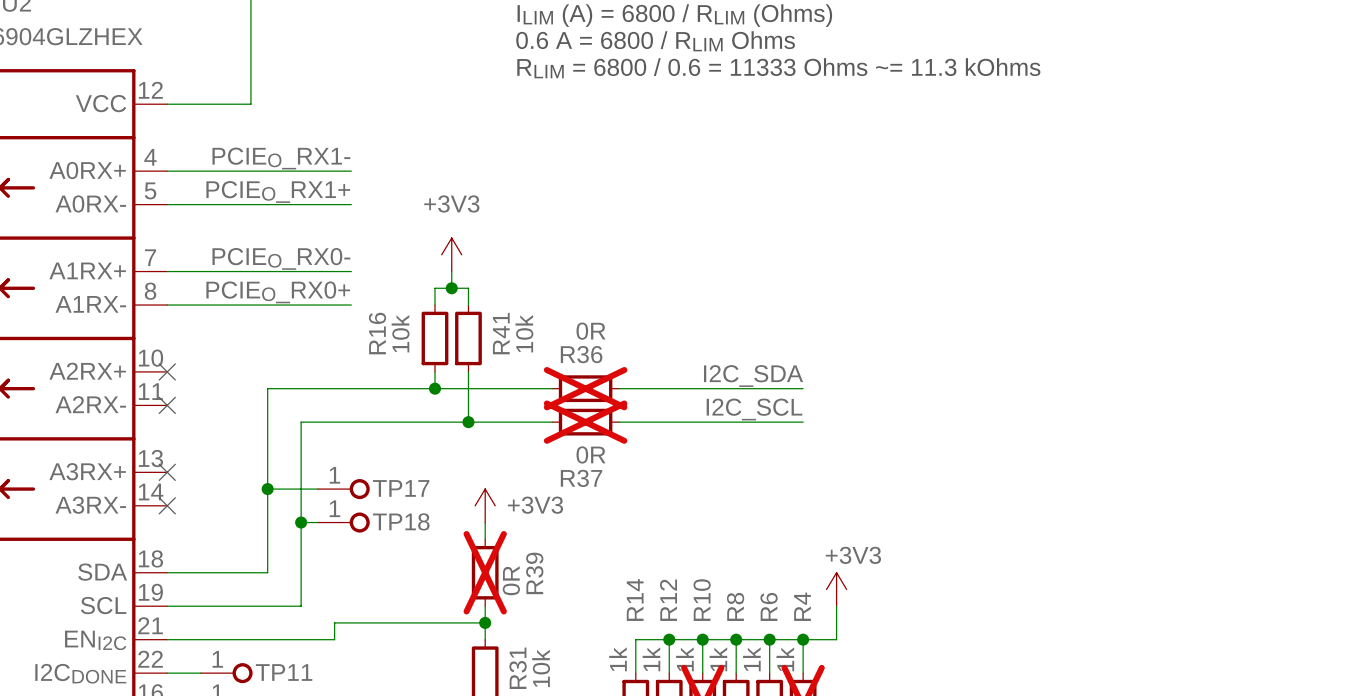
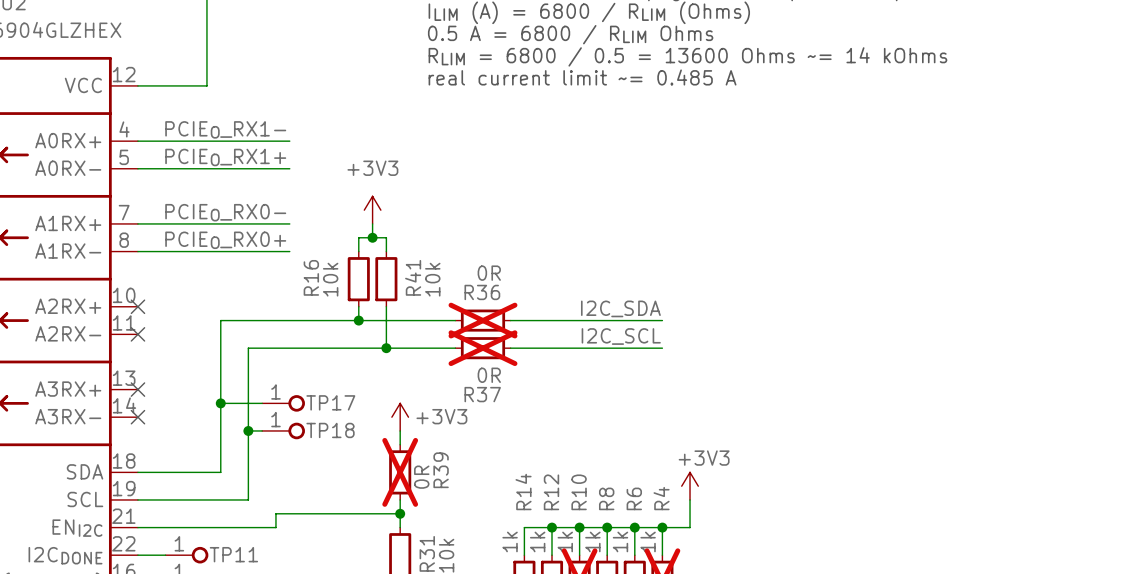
text: 0.6 A = 6800 / RLIM Ohms (655, 41) -> 0.5 A = 6800 / RLIM Ohms (570, 34)
text: RLIM = 6800 / 0.6 = 11333 Ohms ~= 11.3 kOhms (778, 68) -> RLIM = 6800 / 0.5 = 13600 Ohms ~= 14 kOhms (687, 56)
text: none -> real current limit ~= 0.485 A (582, 77)

